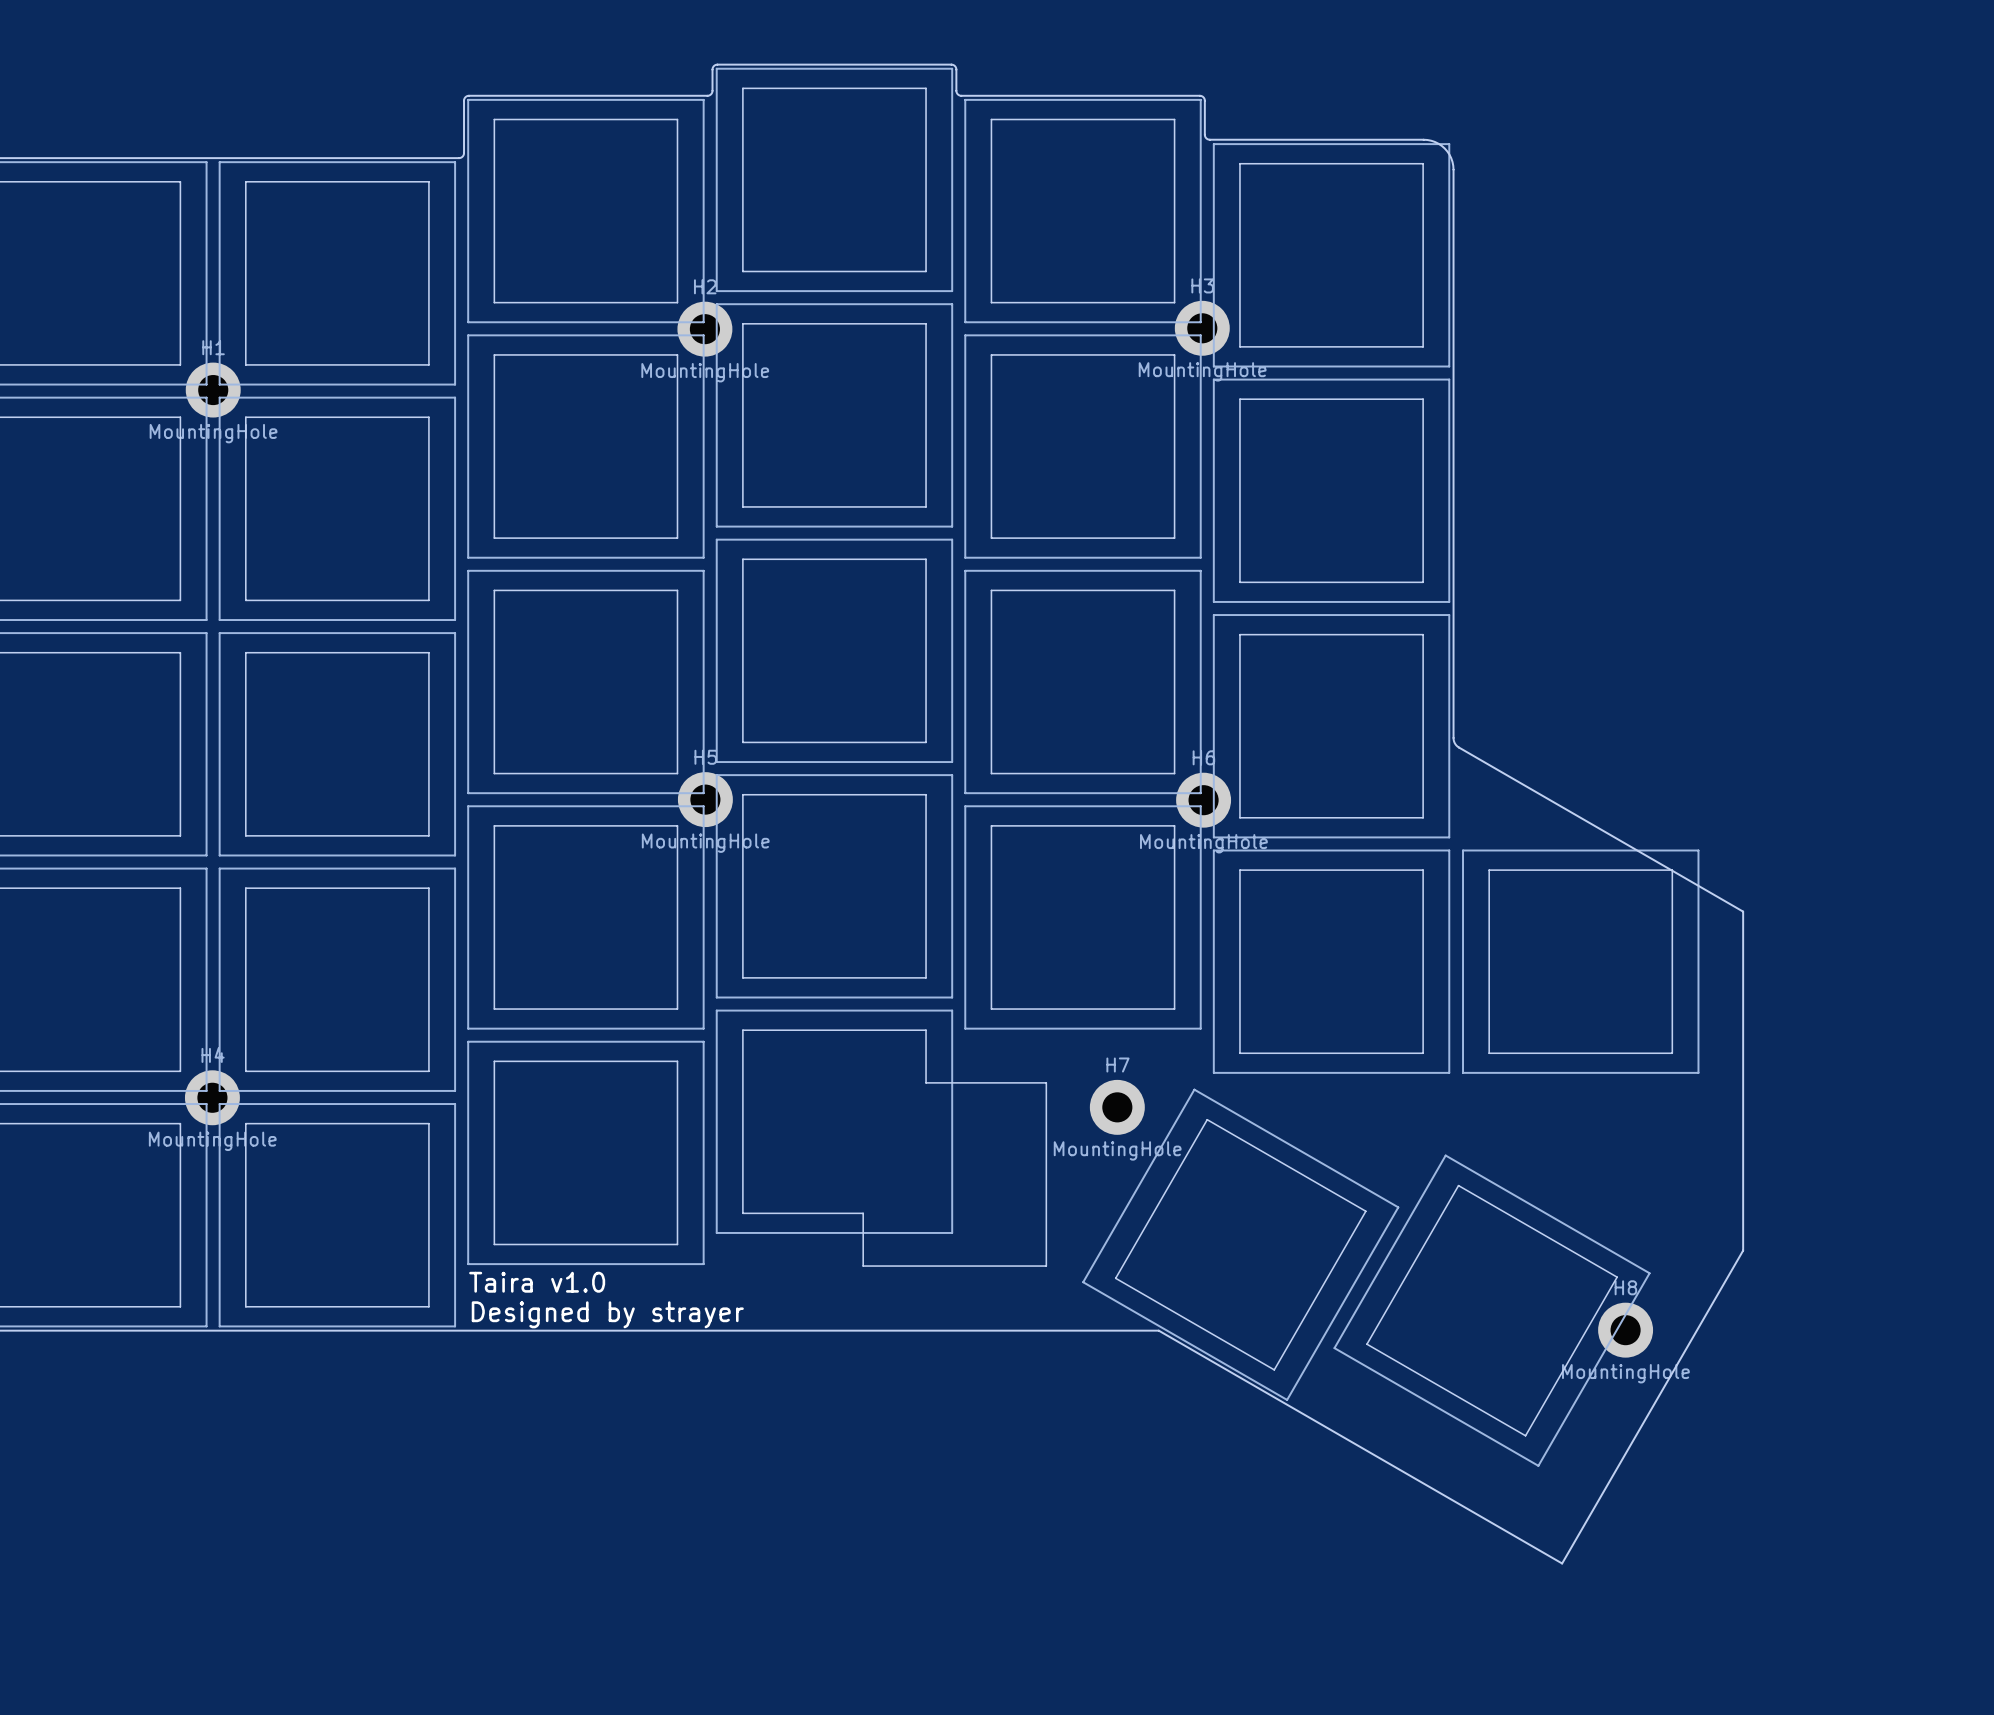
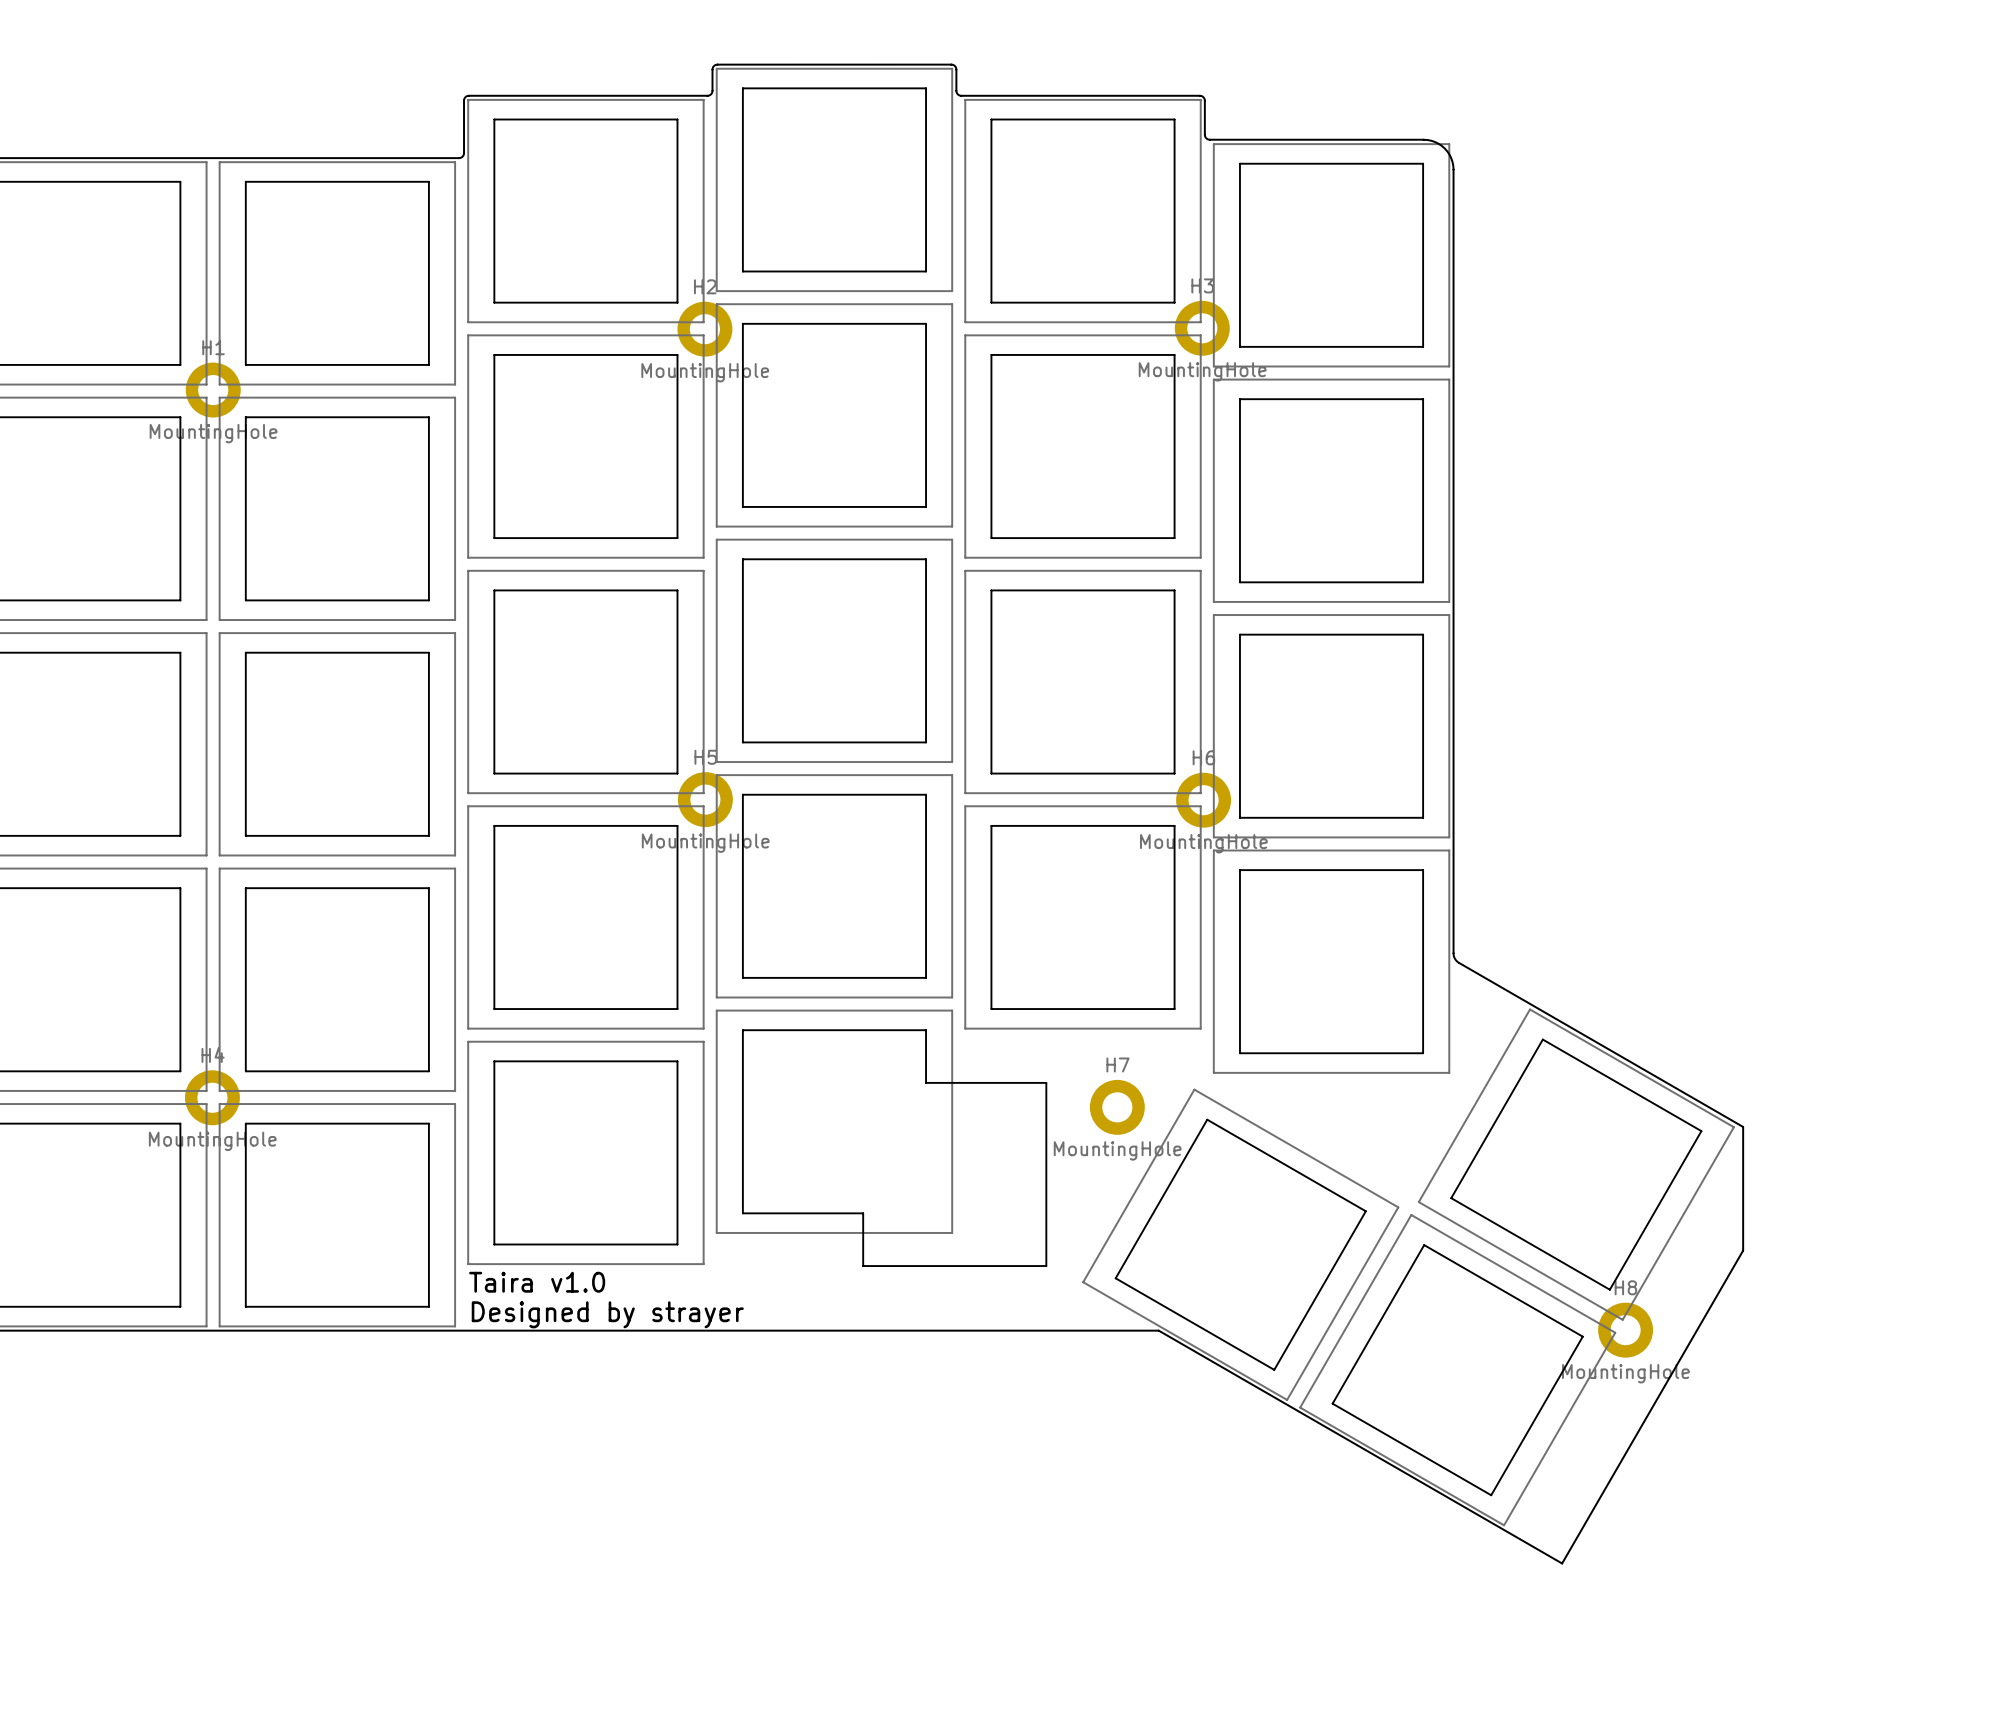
board edge: (1453, 737) (1454, 743) (1459, 747) (1743, 911) (1743, 1126) -> (1453, 737) (1453, 953) (1455, 959) (1743, 1126)
drawing: [1462, 849, 1700, 1074] -> none
drawing: none -> [1417, 1008, 1735, 1321]
drawing position: (1492, 1310) -> (1457, 1370)

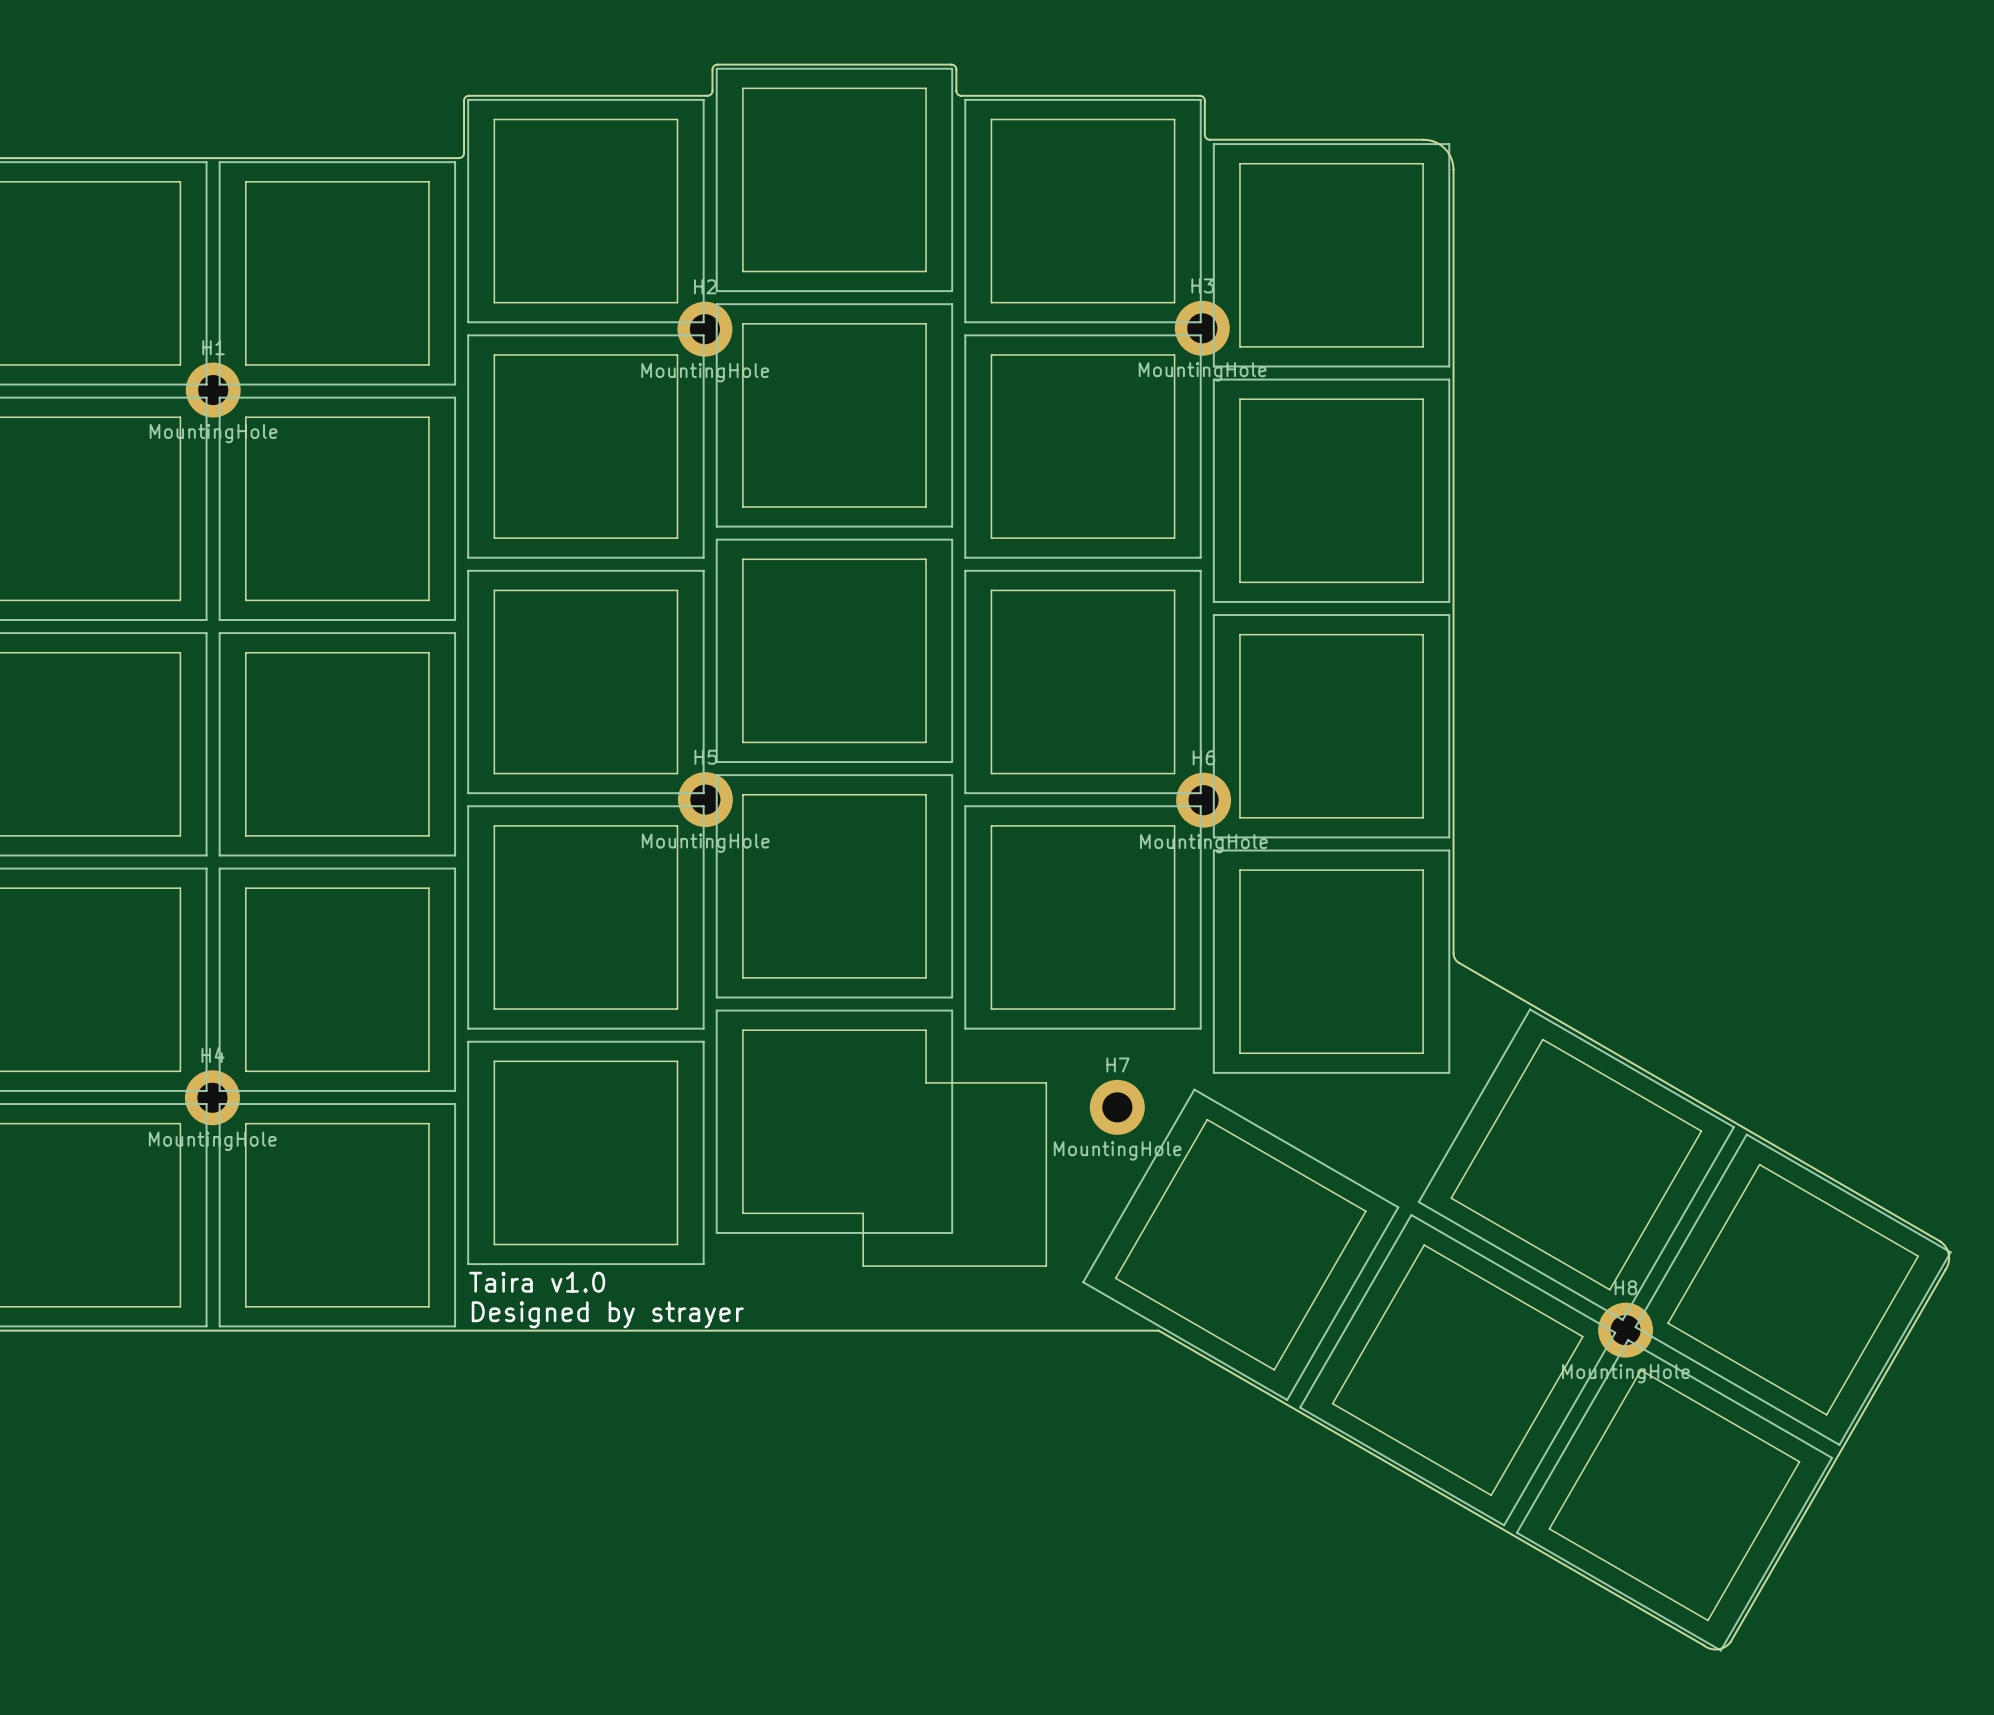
board edge: (1459, 962) (1743, 1126) (1743, 1250) (1562, 1563) (1158, 1330) -> (1459, 962) (1940, 1241) (1947, 1250) (1949, 1259) (1946, 1267) (1730, 1641) (1720, 1648) (1707, 1647) (1158, 1330)
drawing: none -> [1515, 1133, 1952, 1652]

